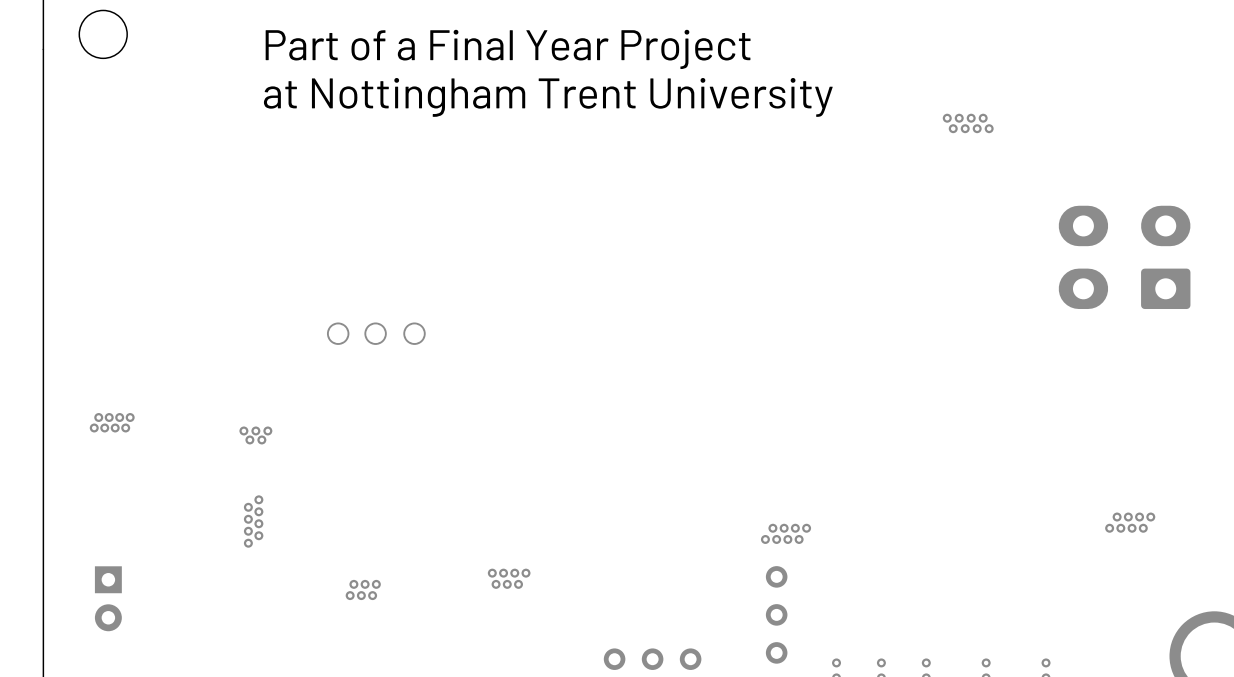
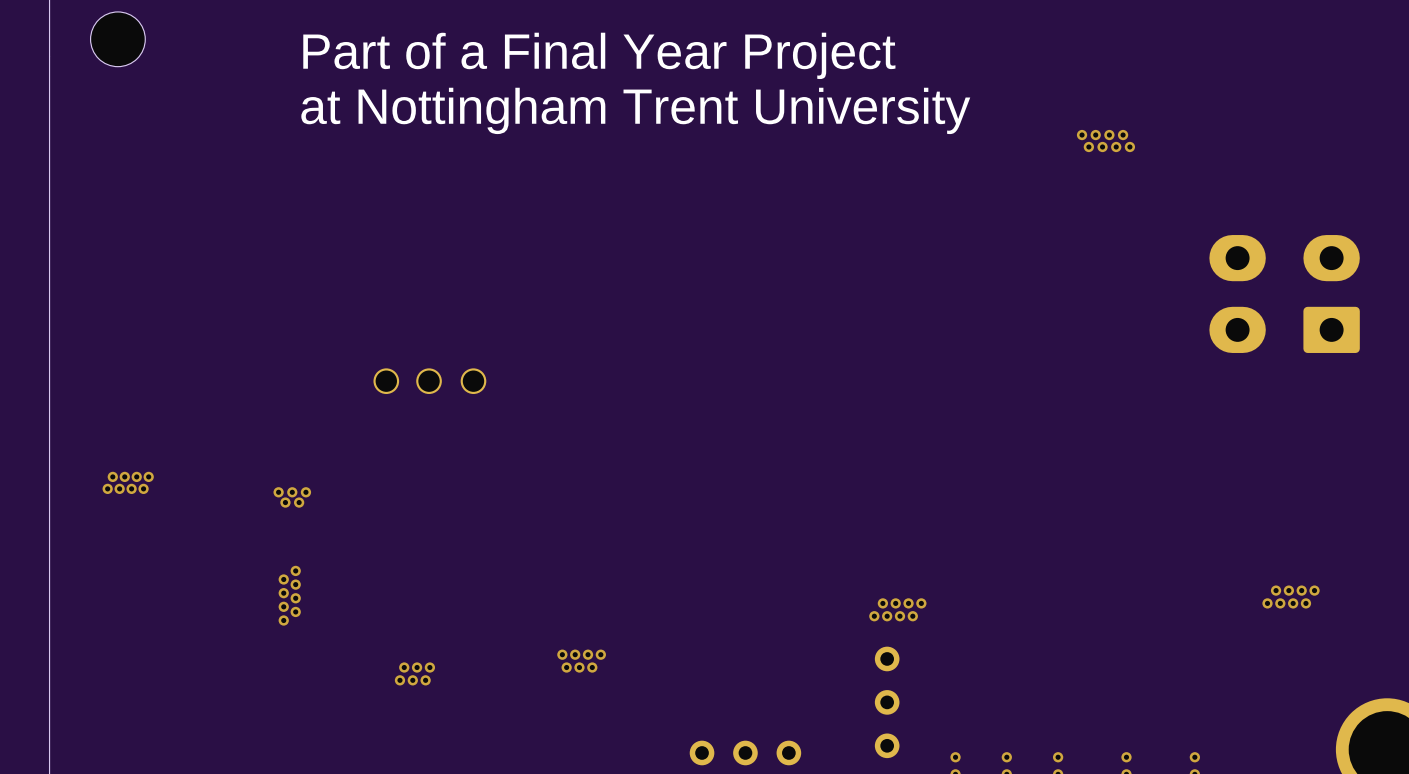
part: (108, 598) -> none

